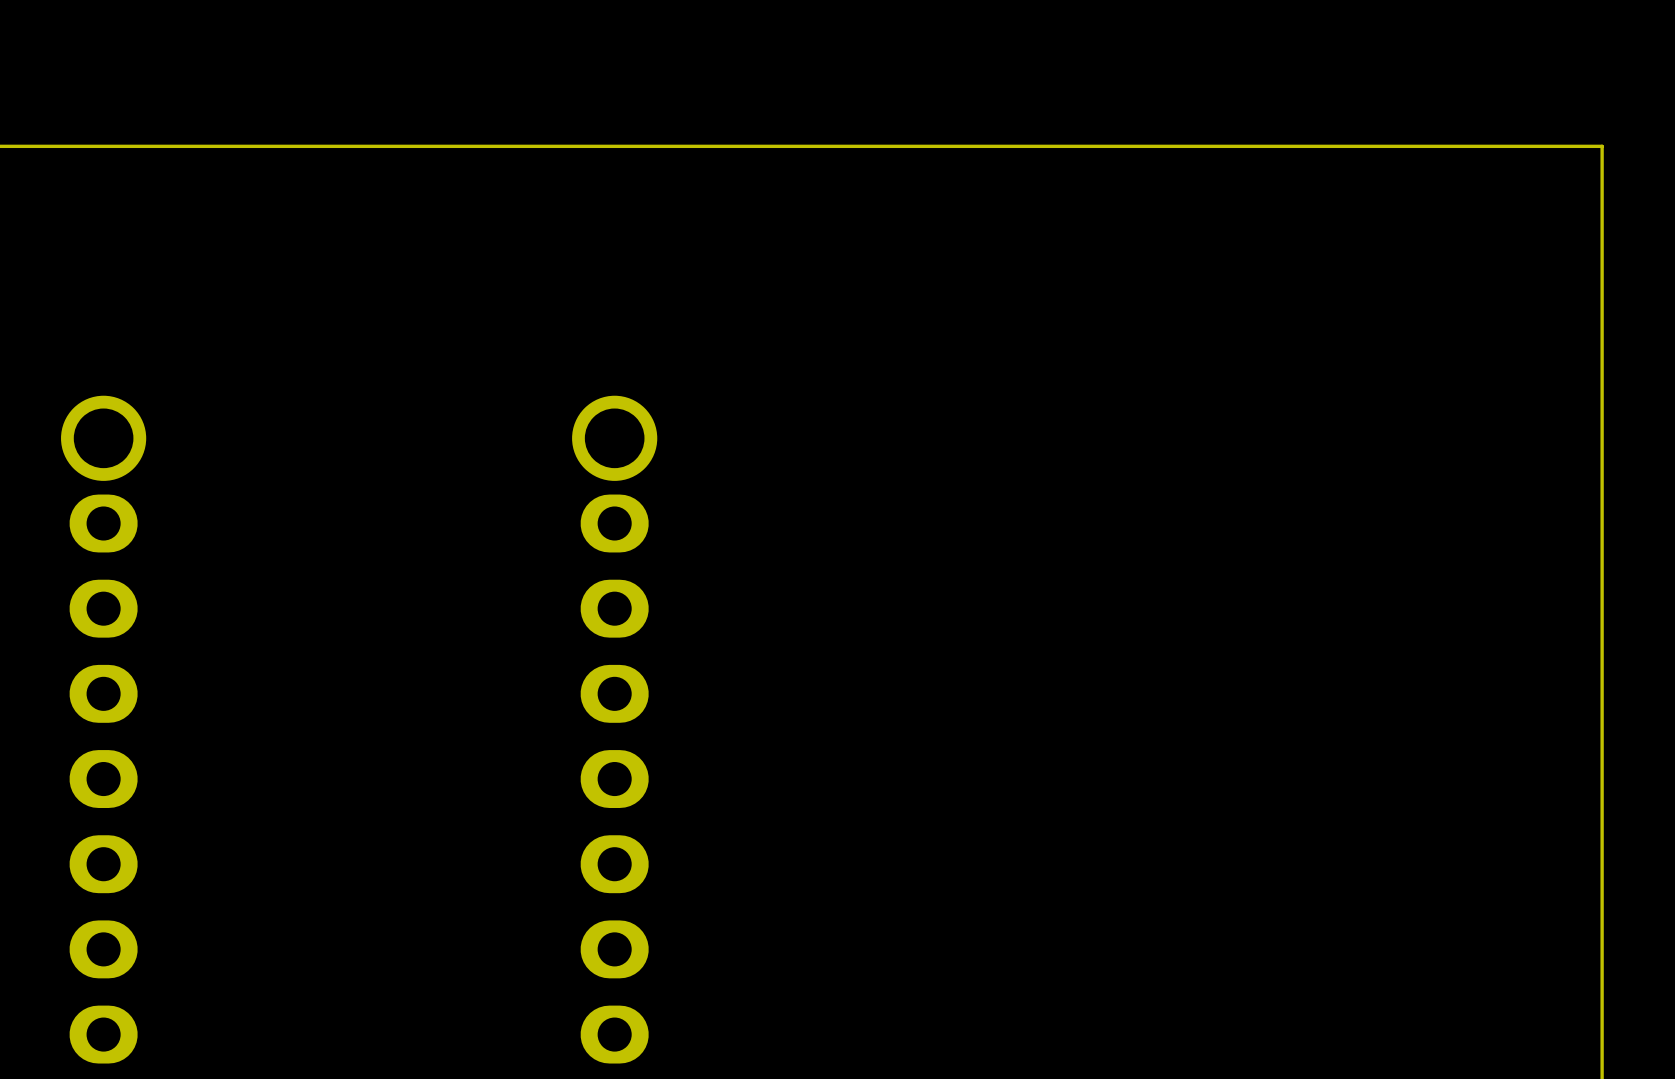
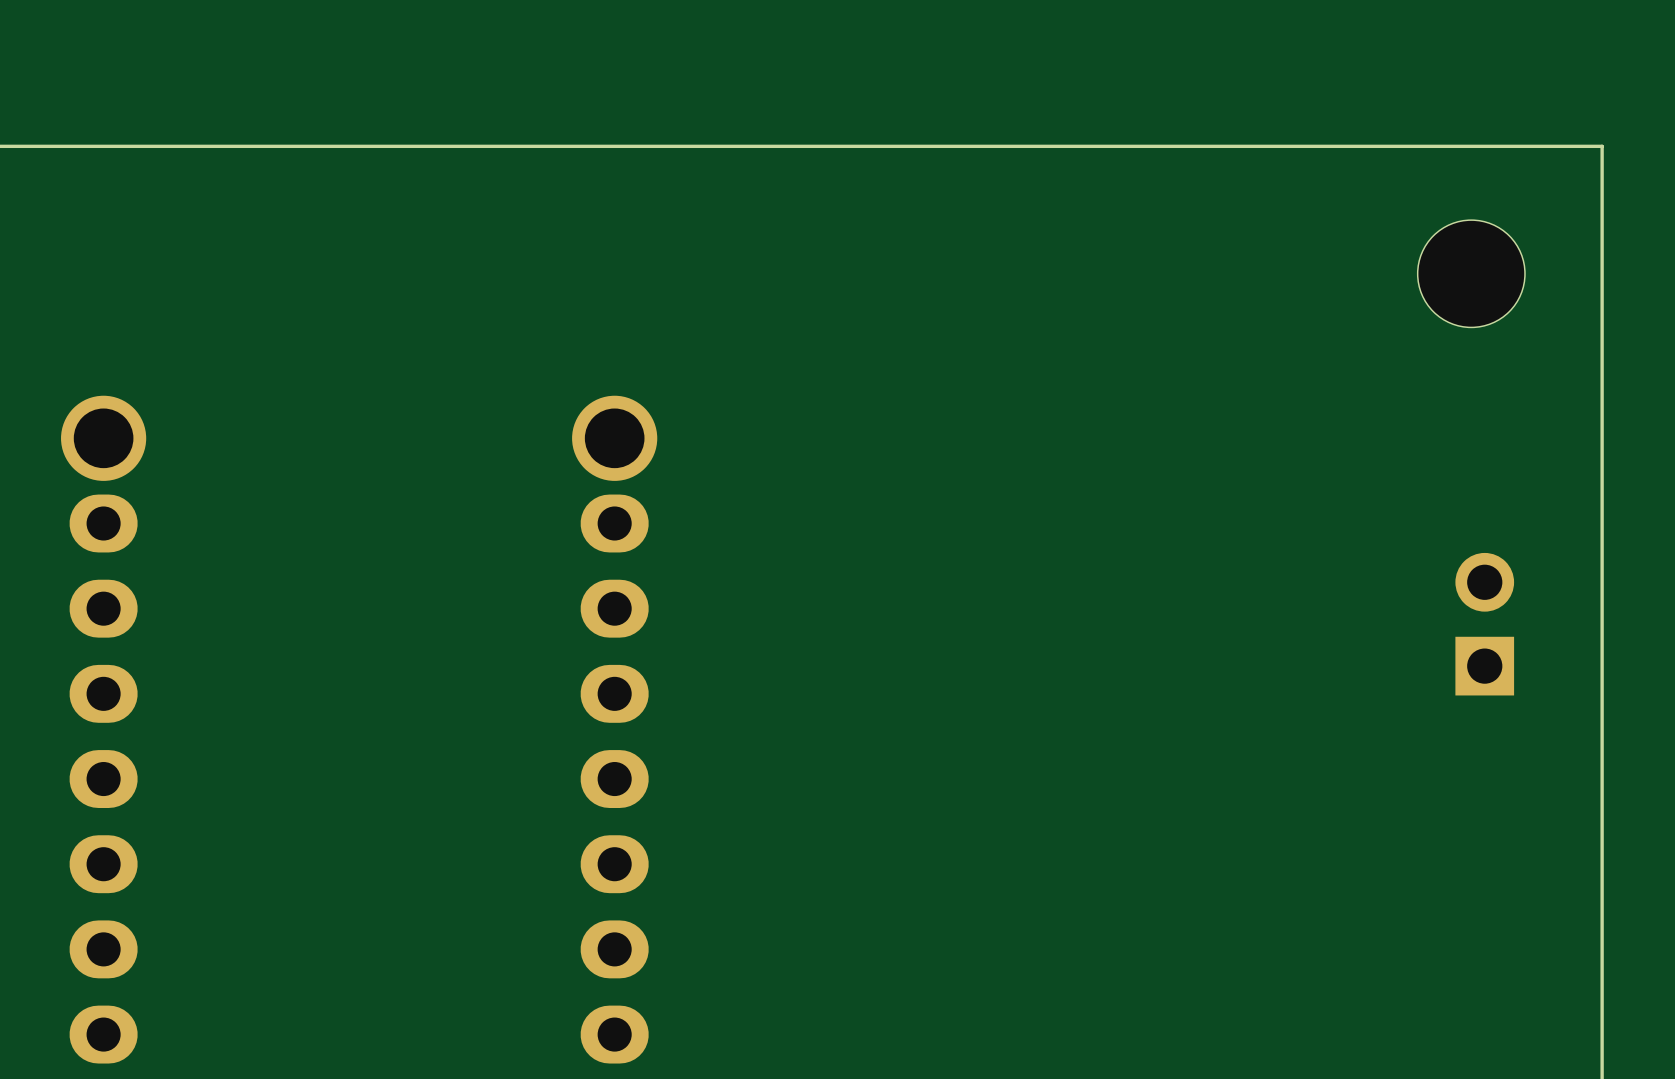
part: none -> (1471, 273)
part: none -> (1484, 624)

